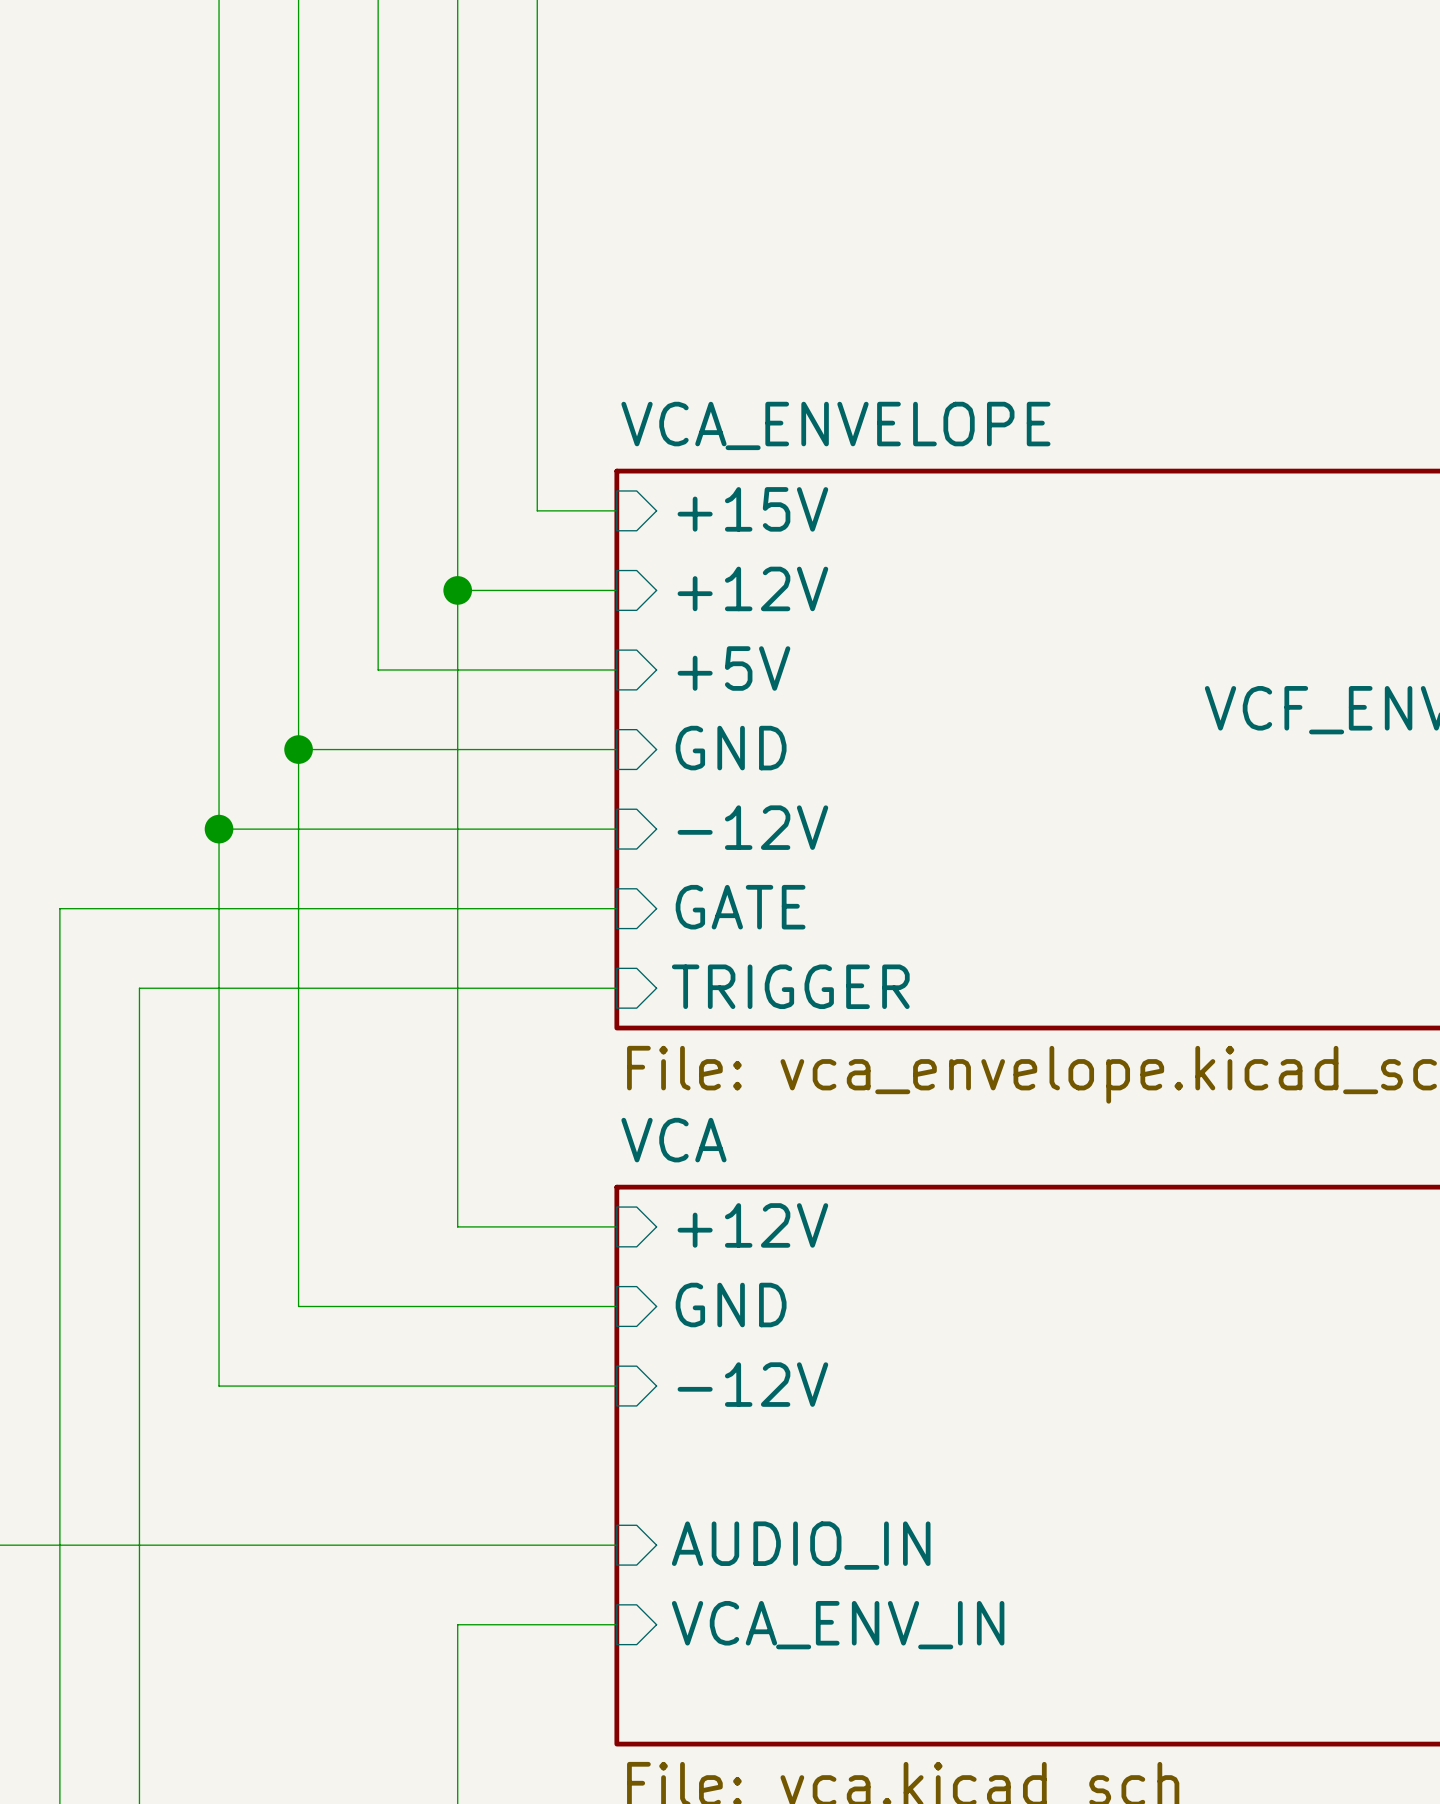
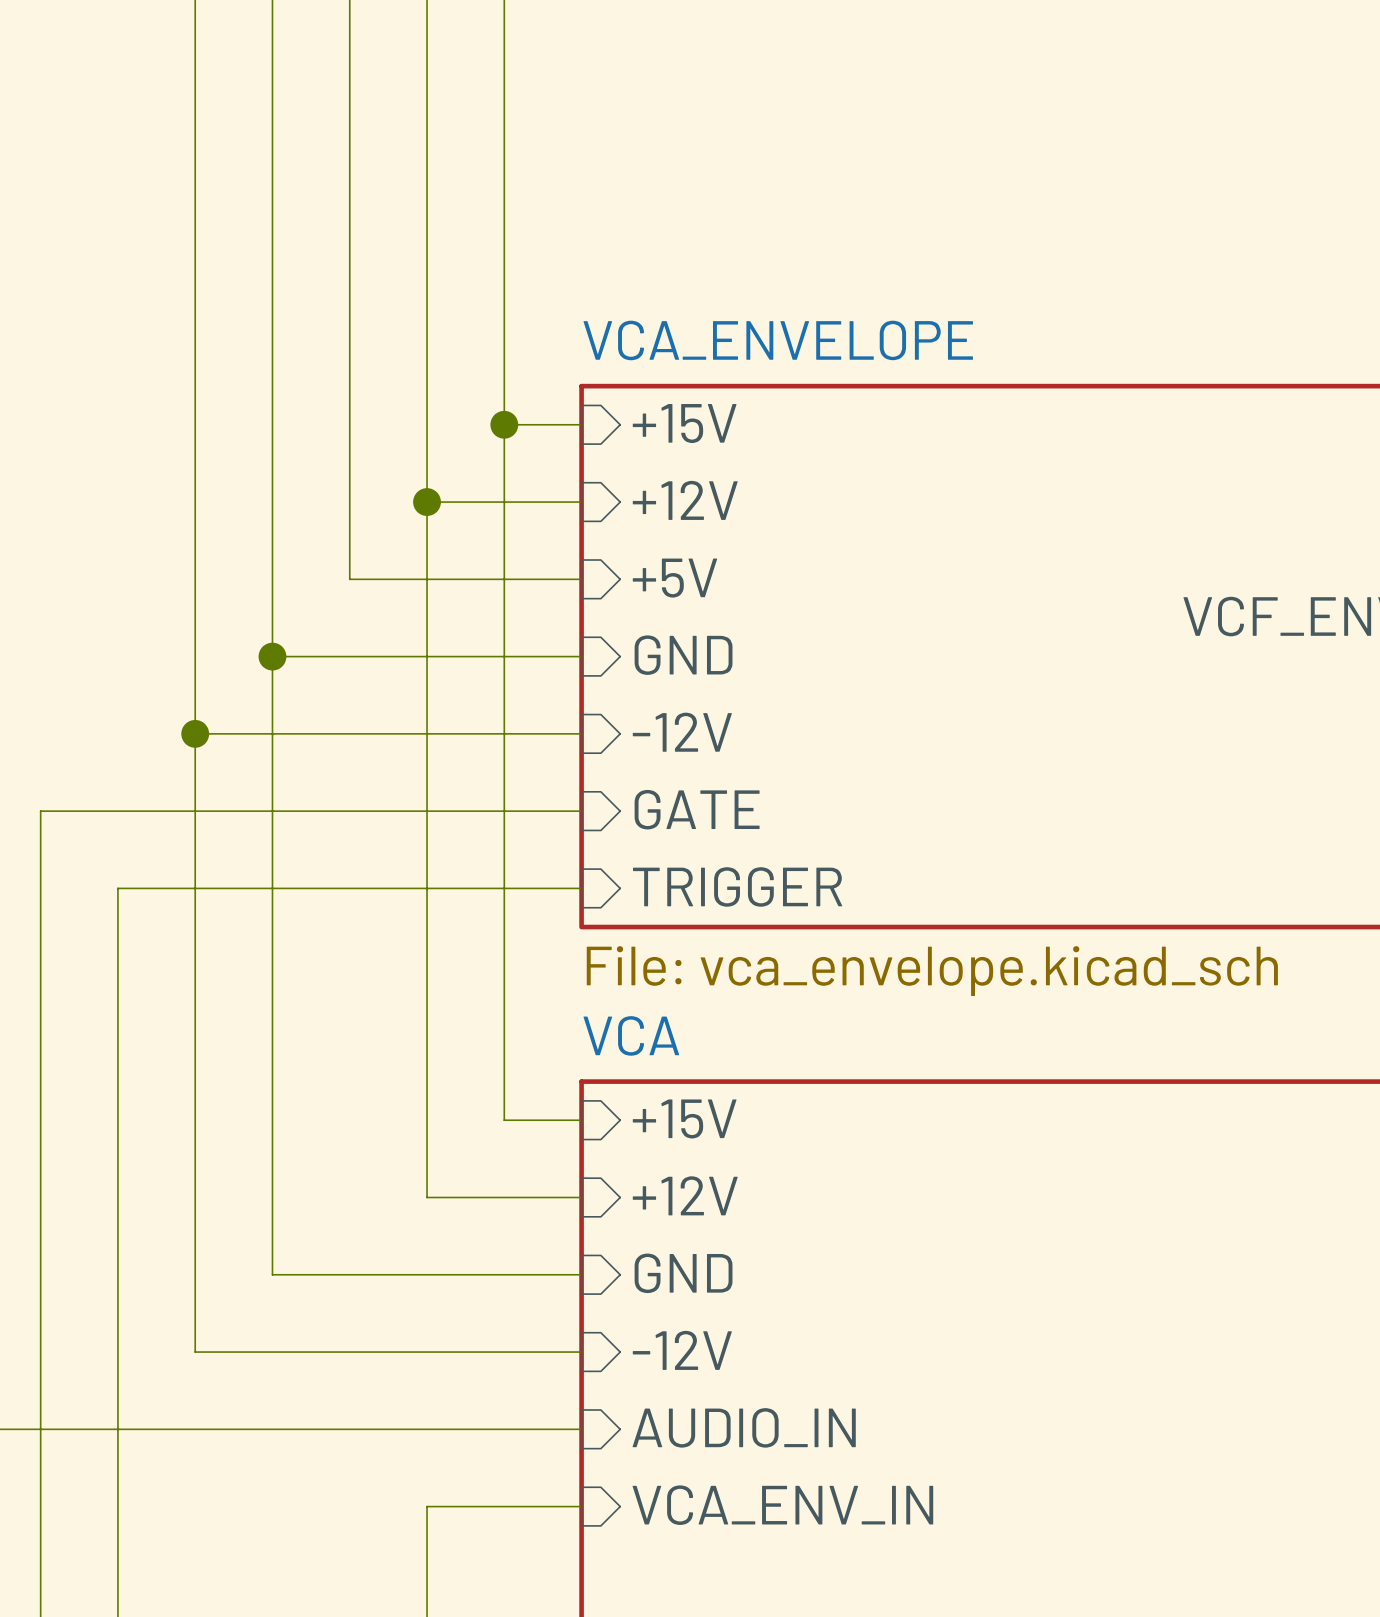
wire: none -> (504, 424) (504, 1120)
junction: none -> (504, 424)
sheet pin: +12V (752, 1225) -> +15V (684, 1118)
wire: (457, 1226) (537, 1226) -> (427, 1120) (427, 1197)
sheet pin: GND (731, 1305) -> +12V (685, 1195)
wire: (298, 1306) (457, 1306) -> none
sheet pin: -12V (752, 1384) -> GND (683, 1273)
wire: (219, 1386) (298, 1386) -> (272, 1197) (272, 1274)
wire: none -> (195, 1274) (195, 1352) (581, 1352)
sheet pin: none -> -12V (682, 1350)

